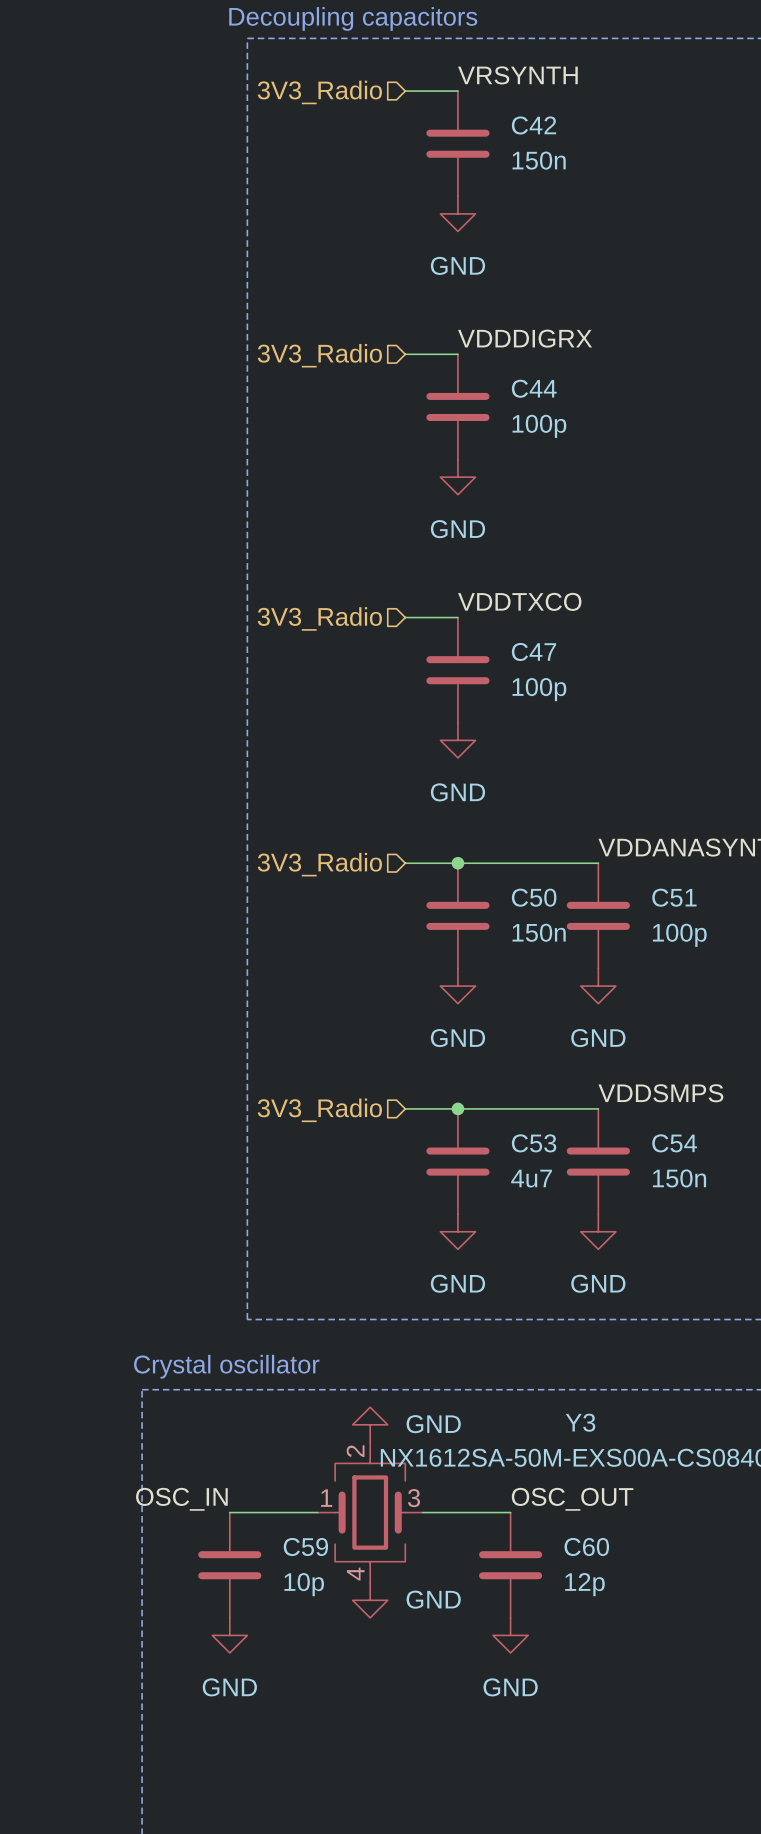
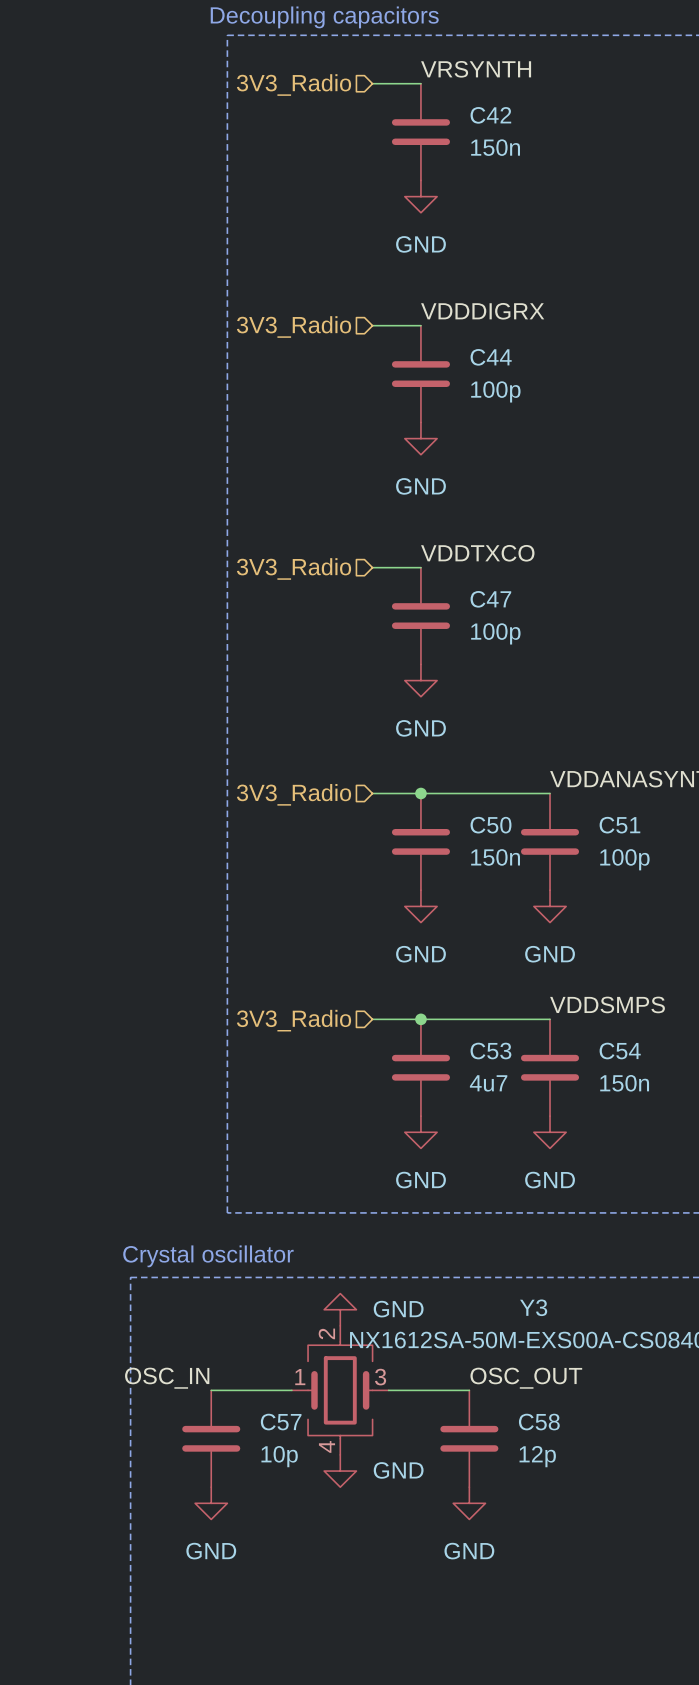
C59 name: C59 (305, 1546) -> C57 (281, 1422)
C60 name: C60 (586, 1546) -> C58 (539, 1422)

